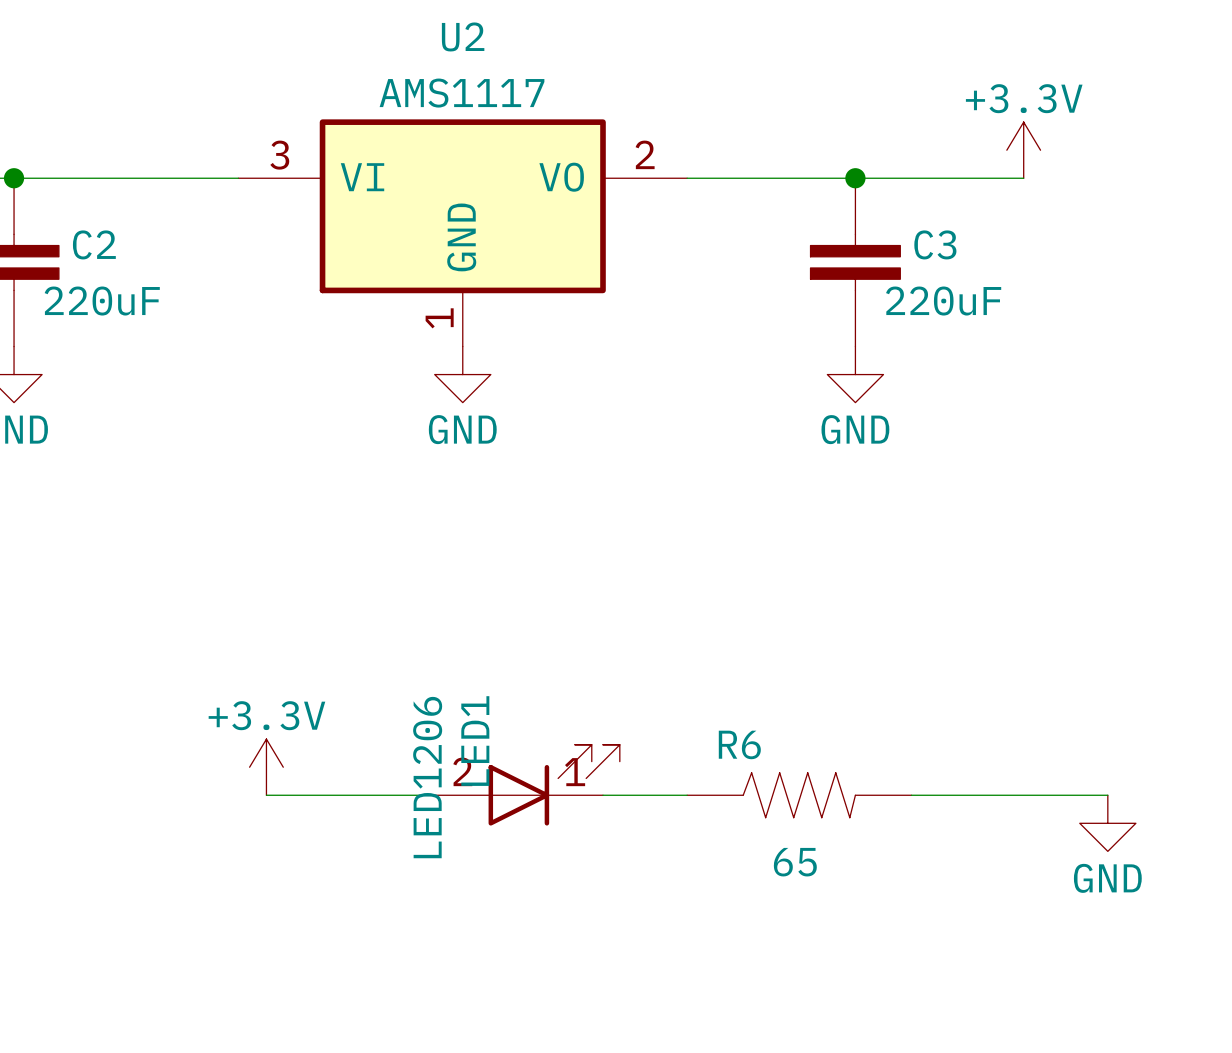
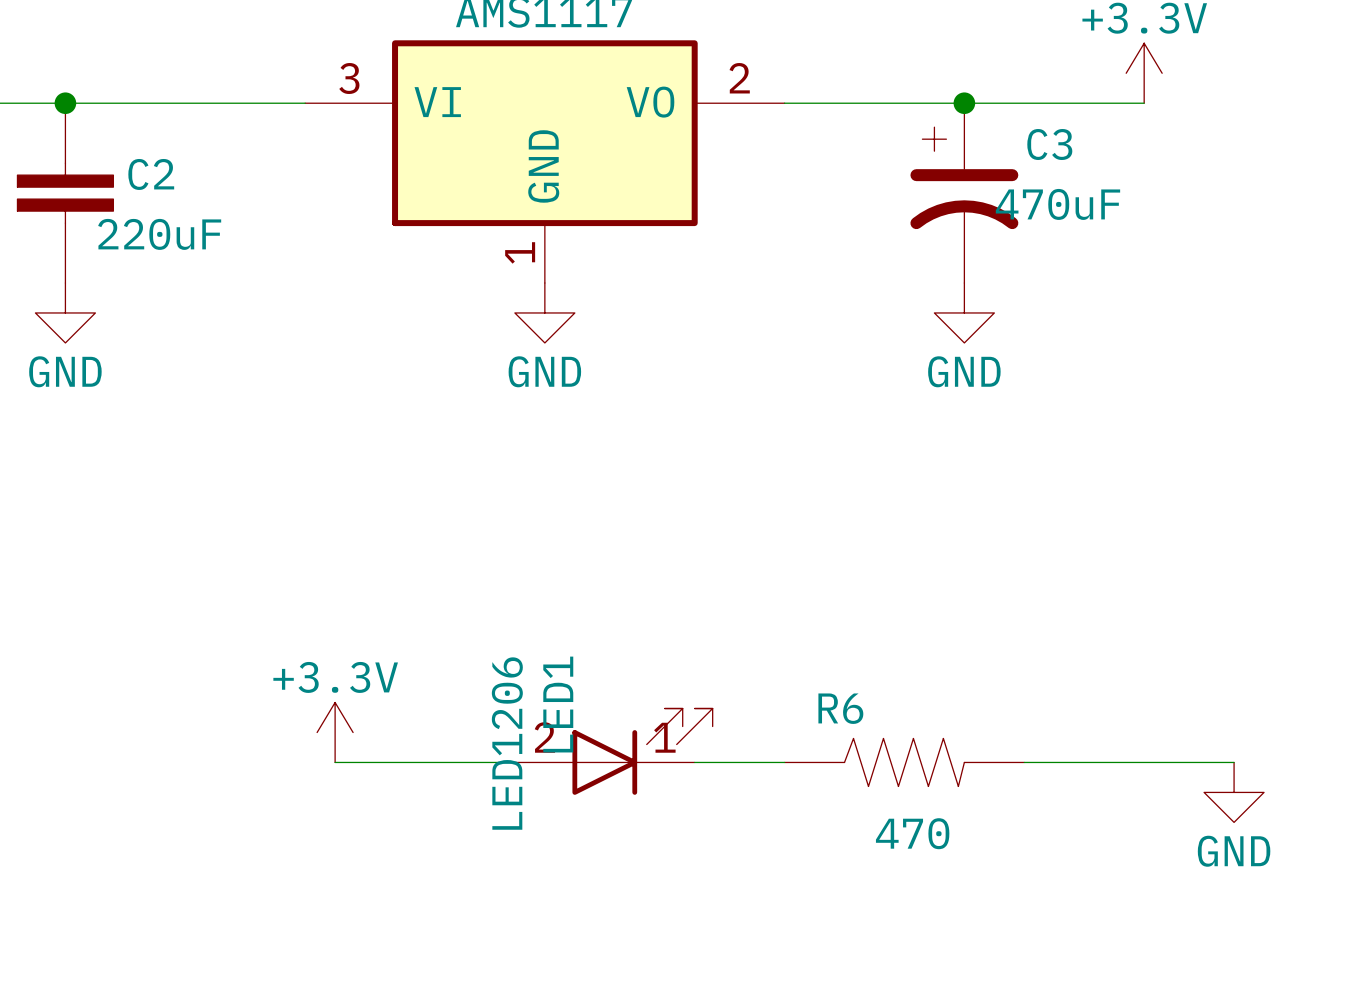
C3 symbol: [810, 178, 901, 347] -> [910, 103, 1019, 284]
C3 value: 220uF (943, 301) -> 470uF (1057, 204)
R6 value: 65 (795, 862) -> 470 (912, 833)

